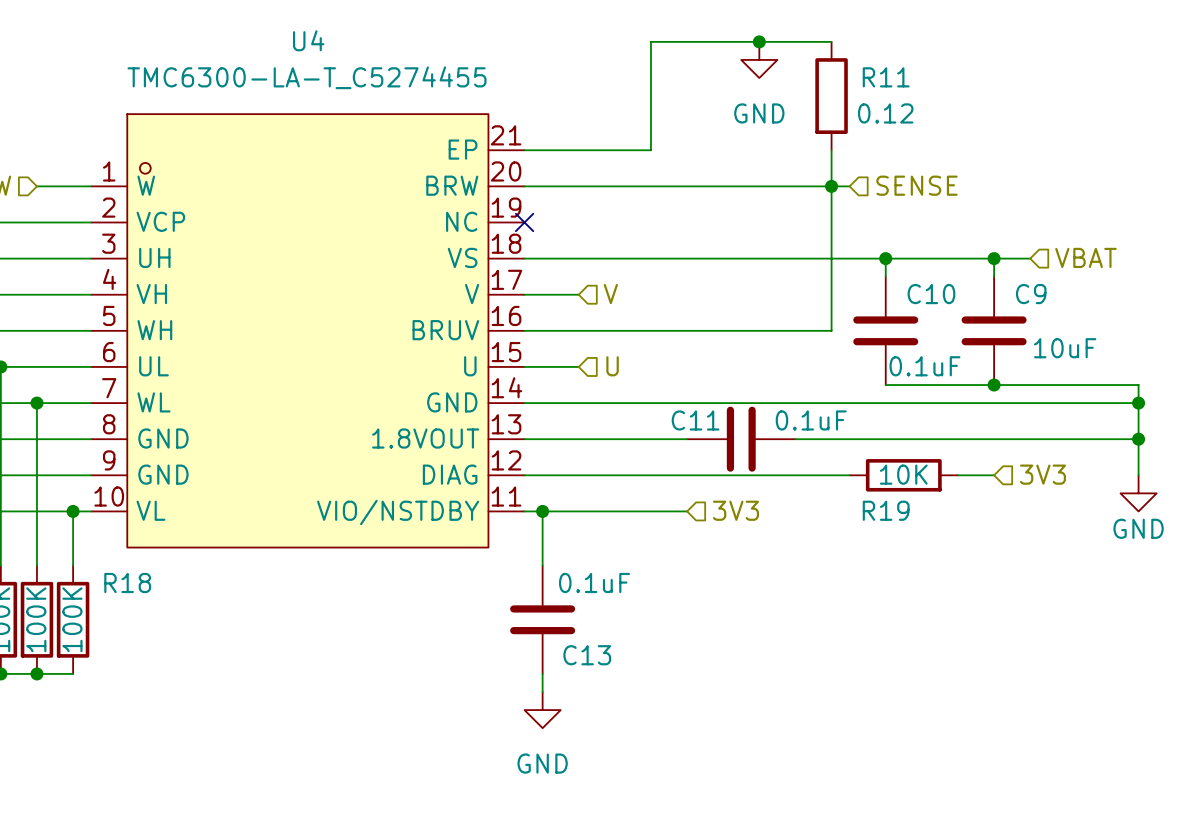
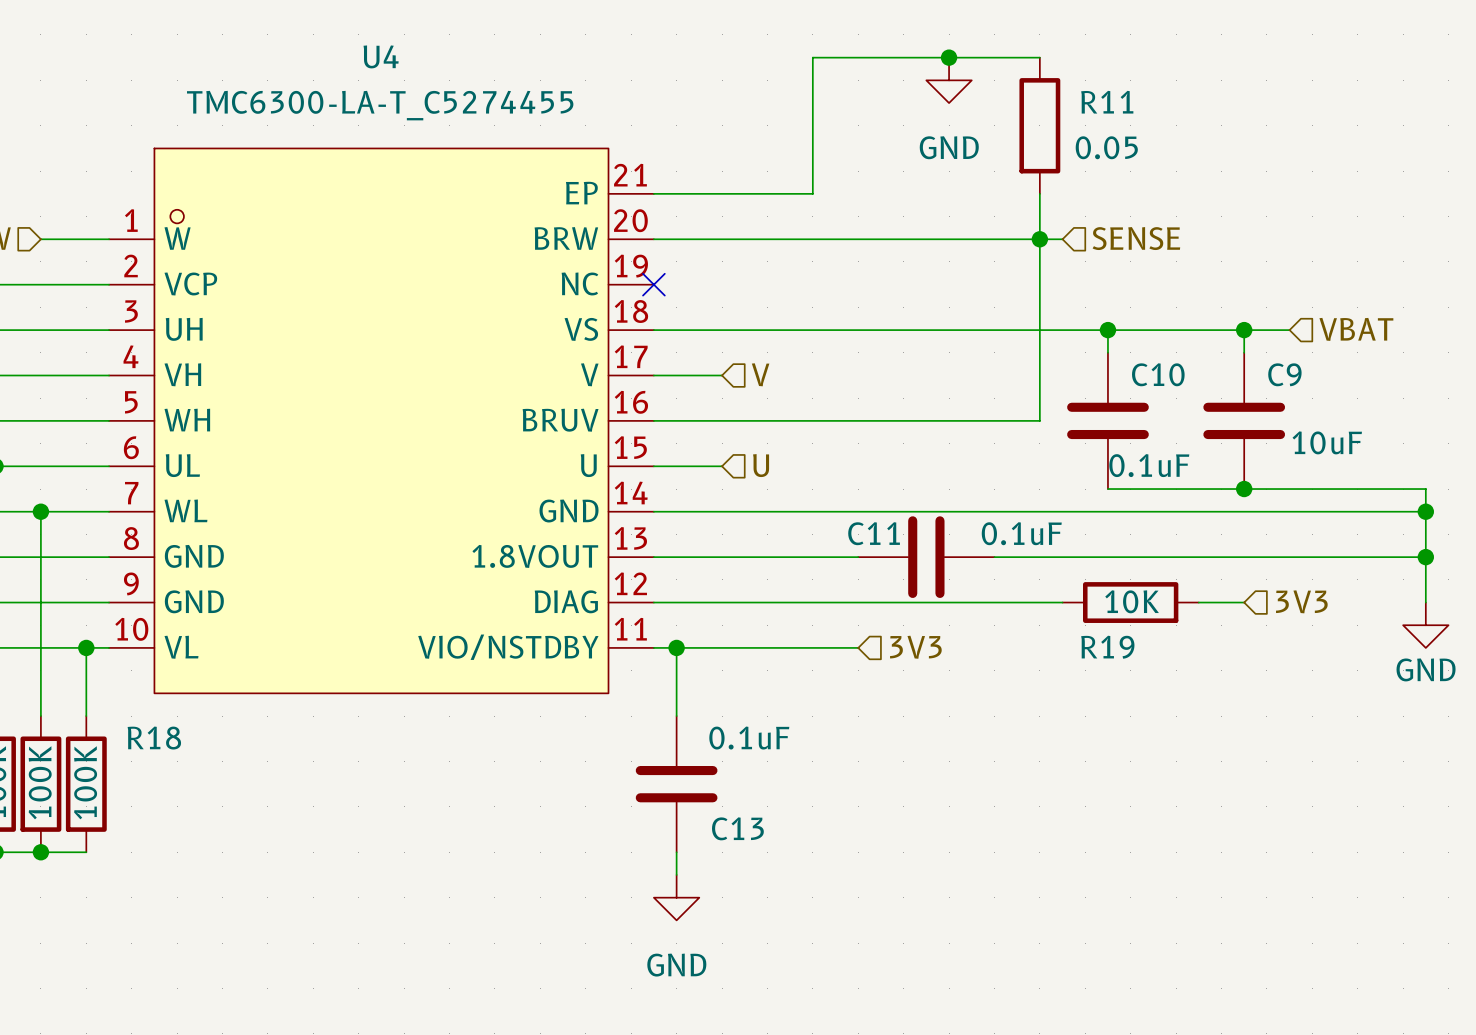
R11 value: 0.12 (885, 113) -> 0.05 (1106, 147)

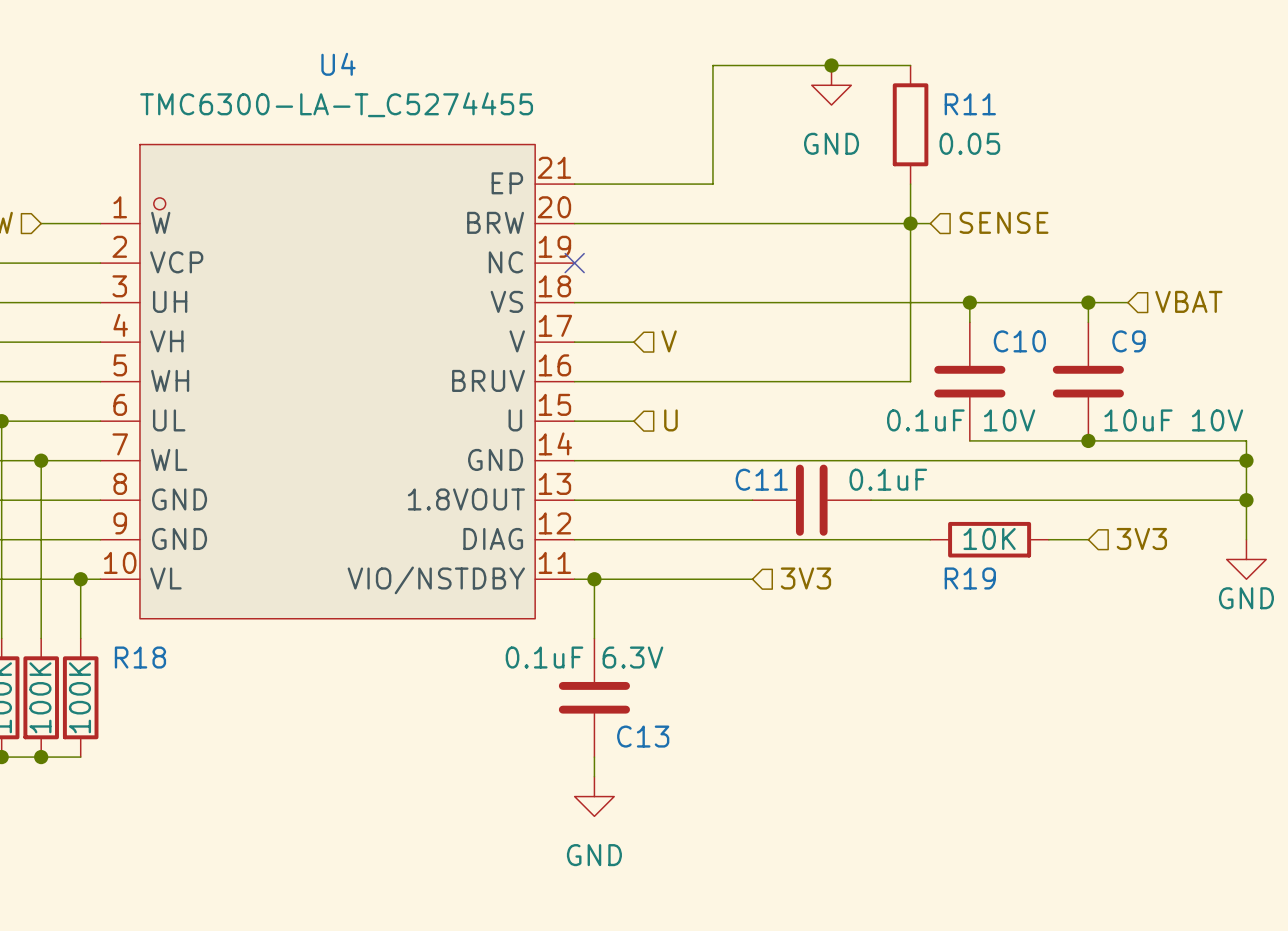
C9 value: 10uF (1327, 442) -> 10uF 10V (1173, 420)
C10 value: 0.1uF (1149, 465) -> 0.1uF 10V (961, 420)
C13 value: 0.1uF (749, 738) -> 0.1uF 6.3V (584, 657)

